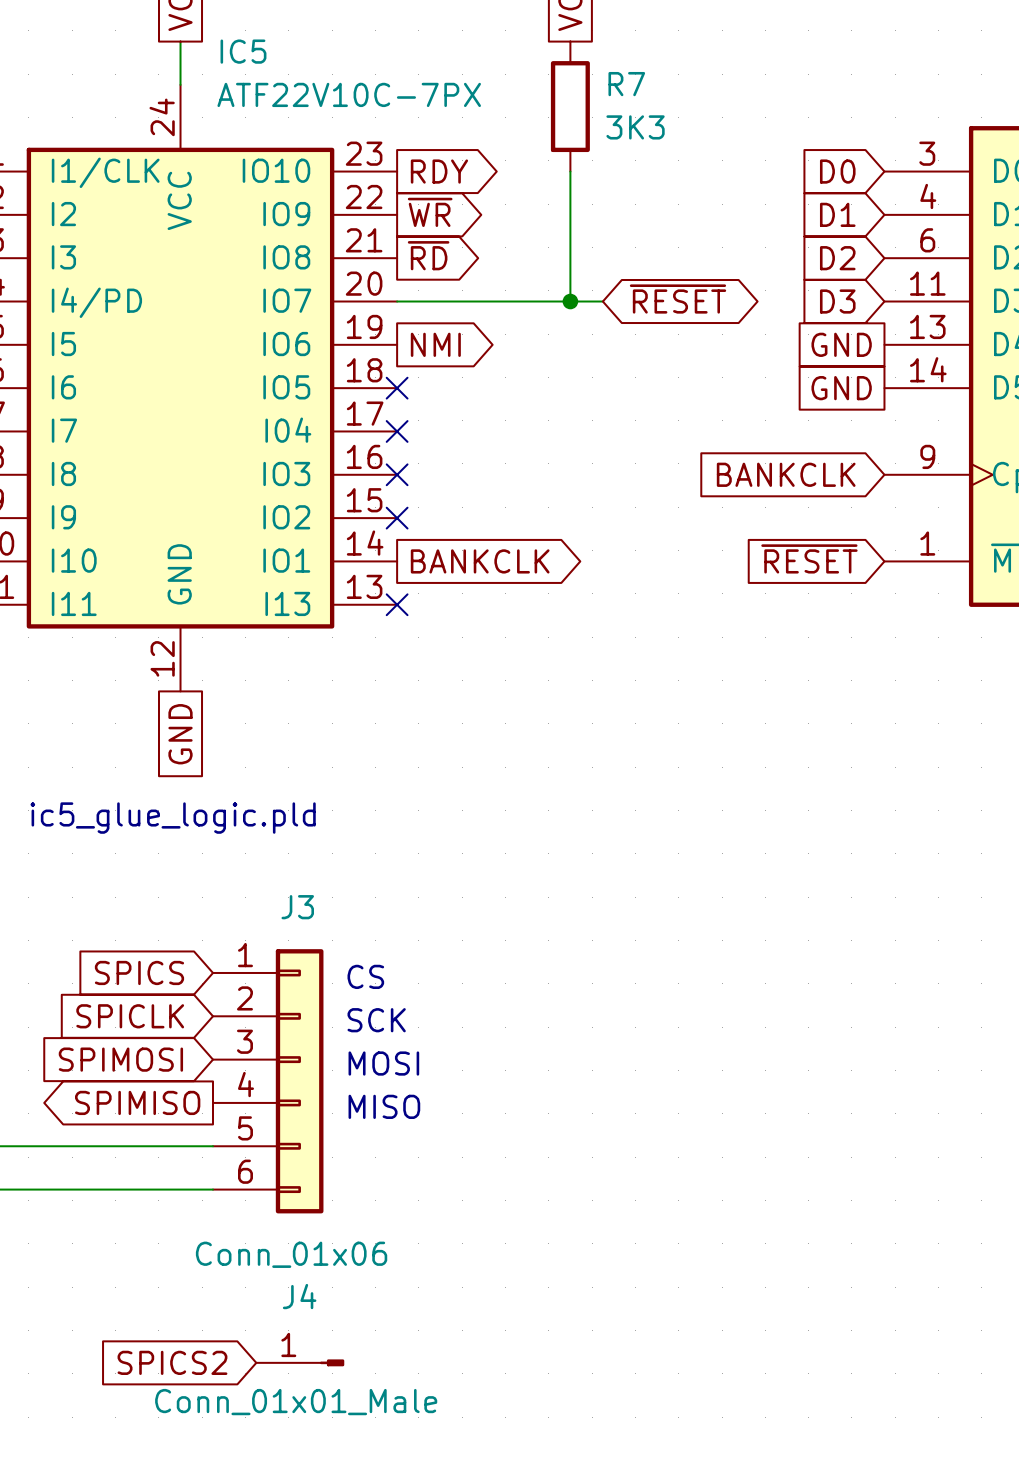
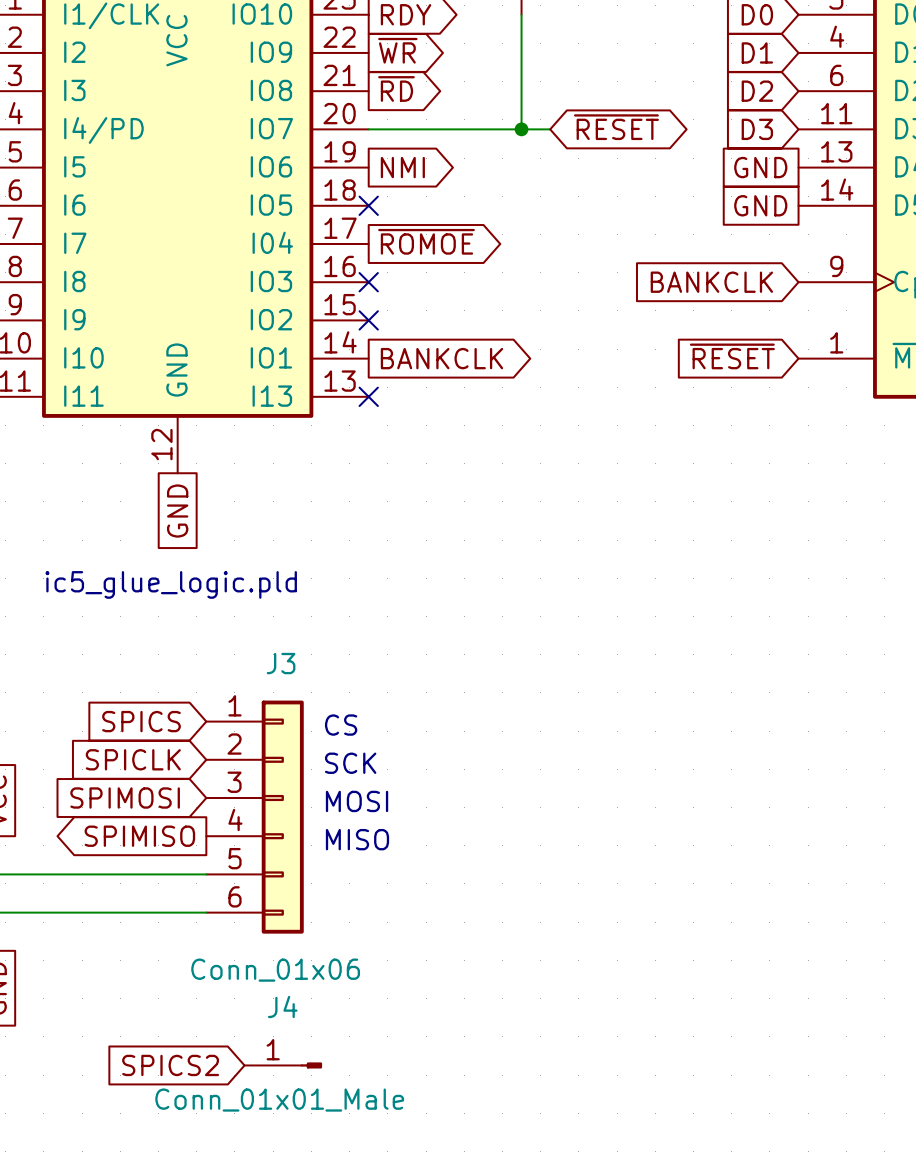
global label: none -> ~{ROMOE} (426, 241)
no-connect mark: (397, 431) -> none

